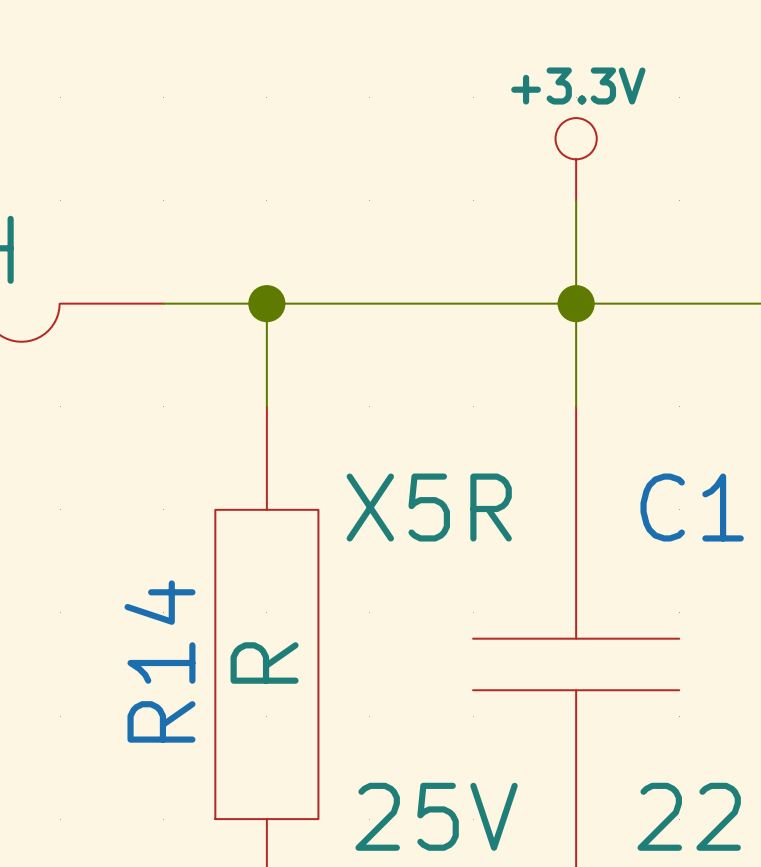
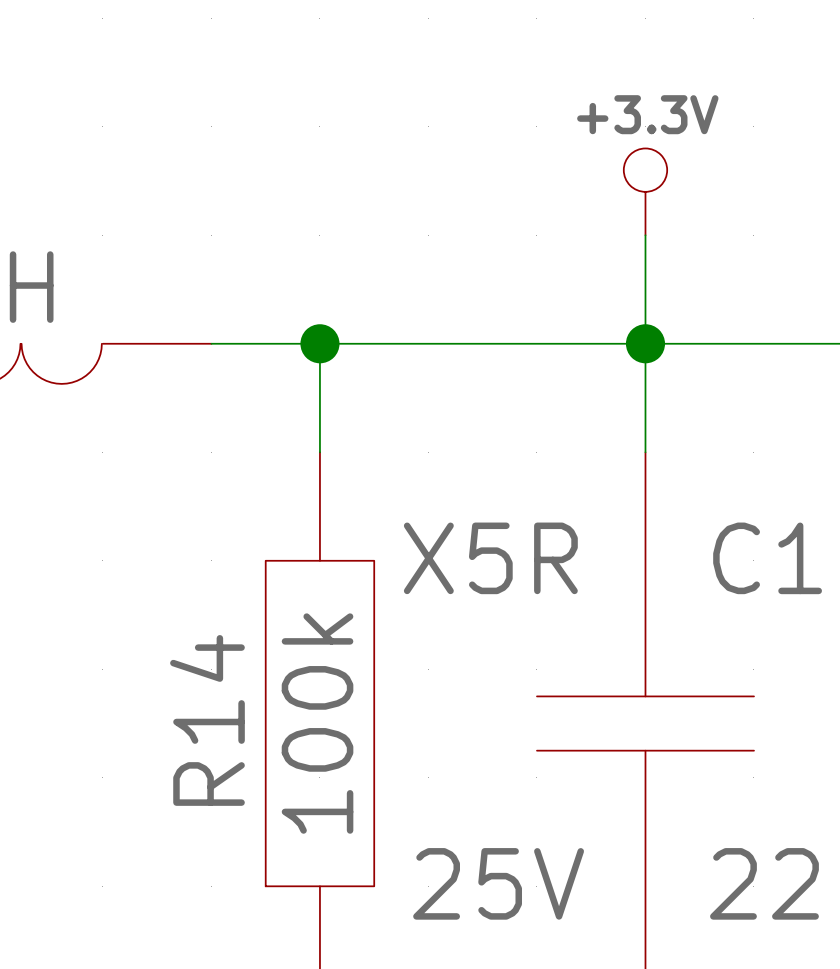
R14 value: R (264, 662) -> 100k (317, 723)

